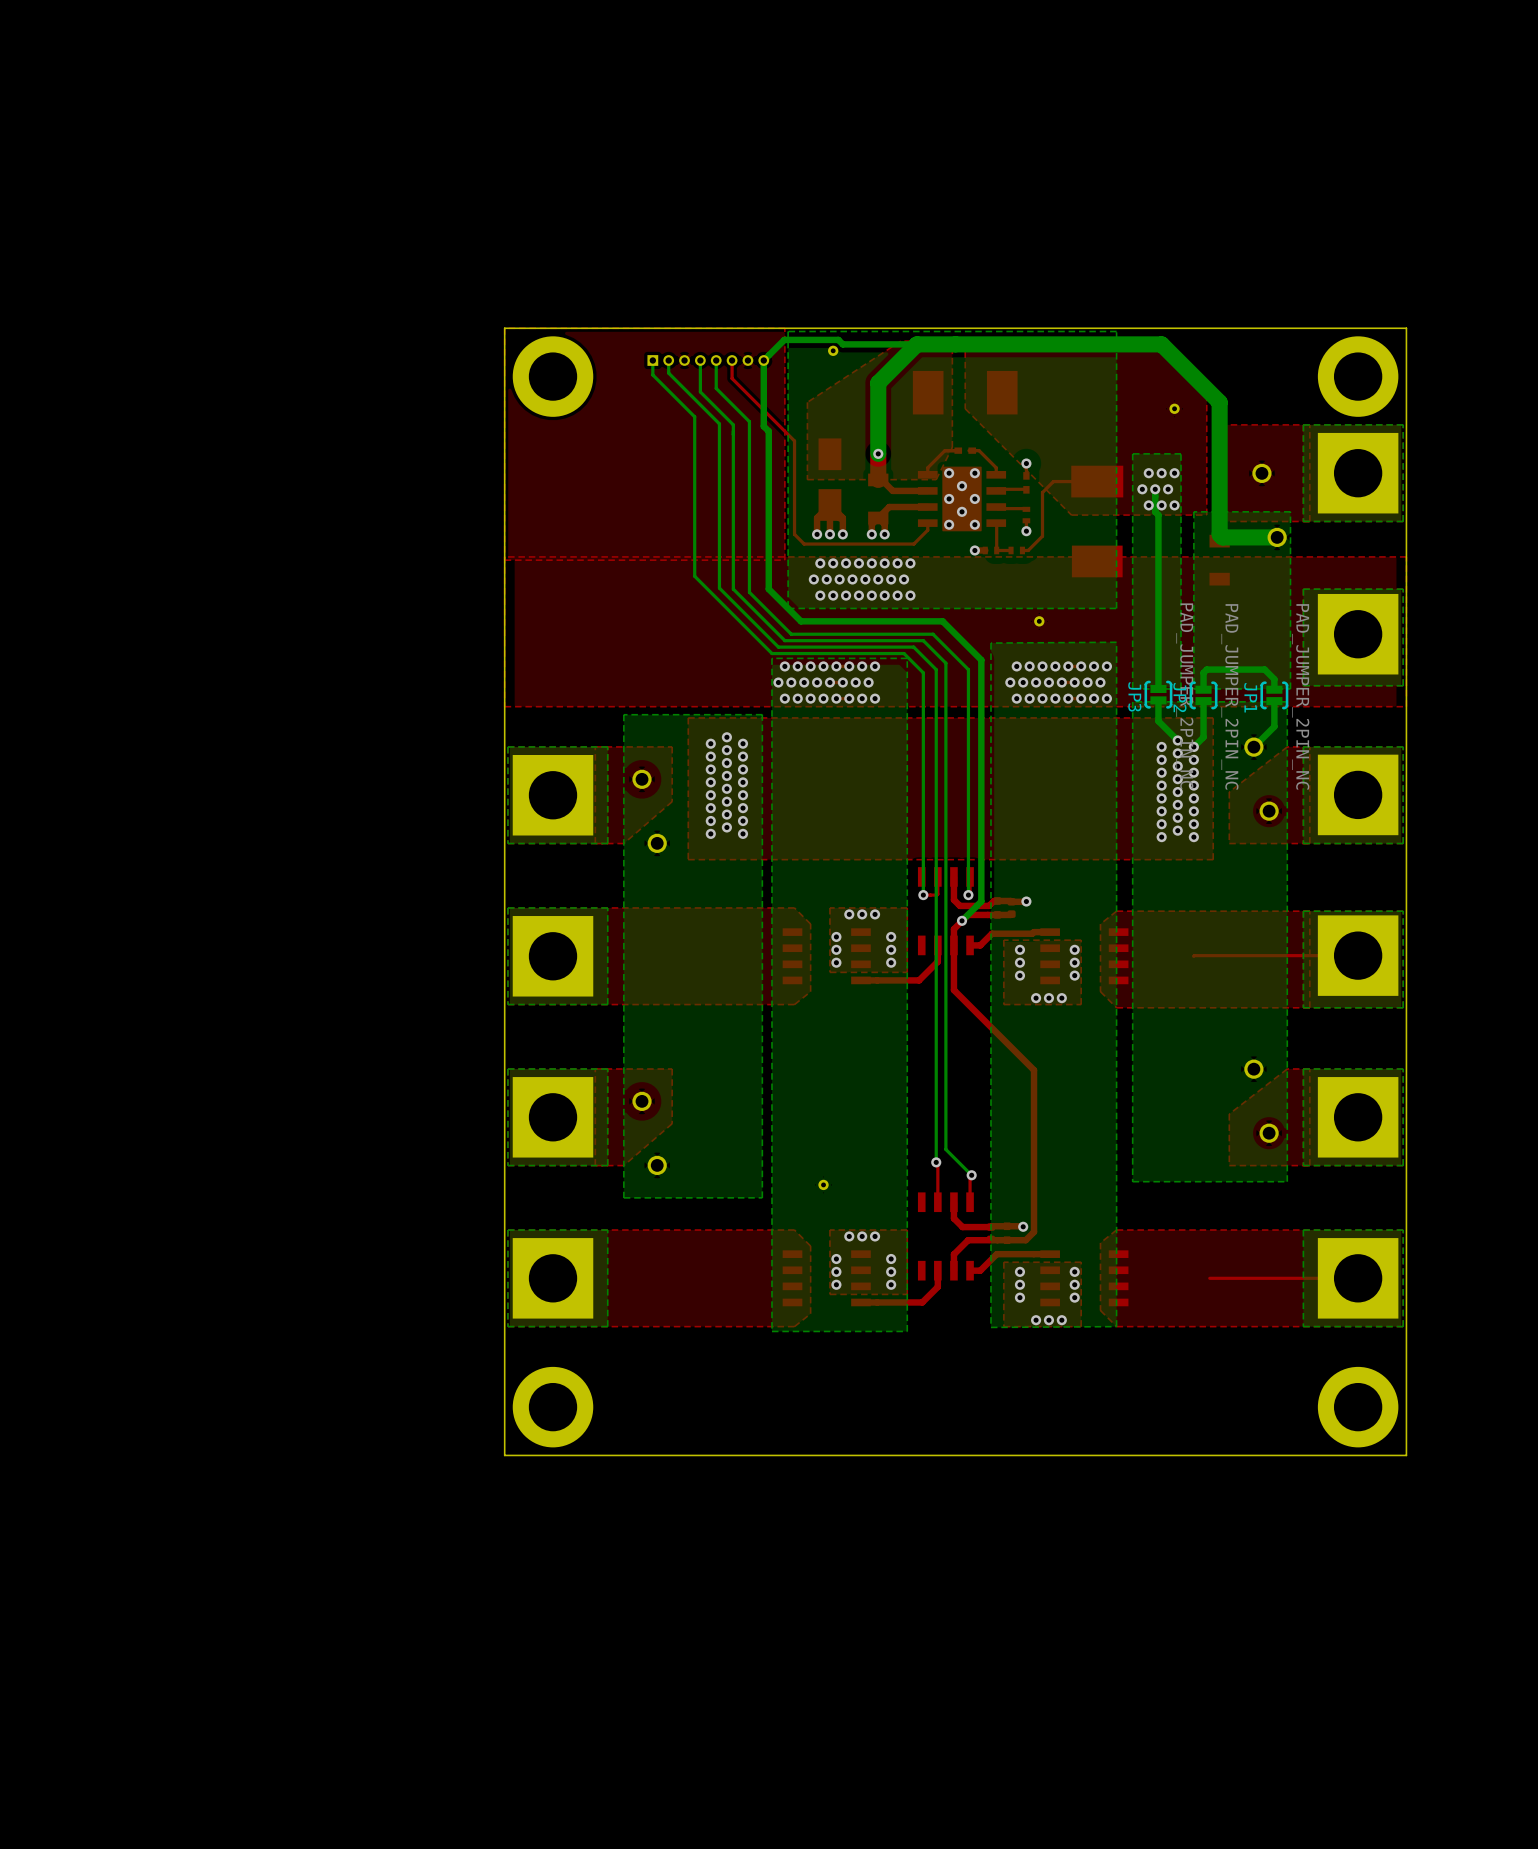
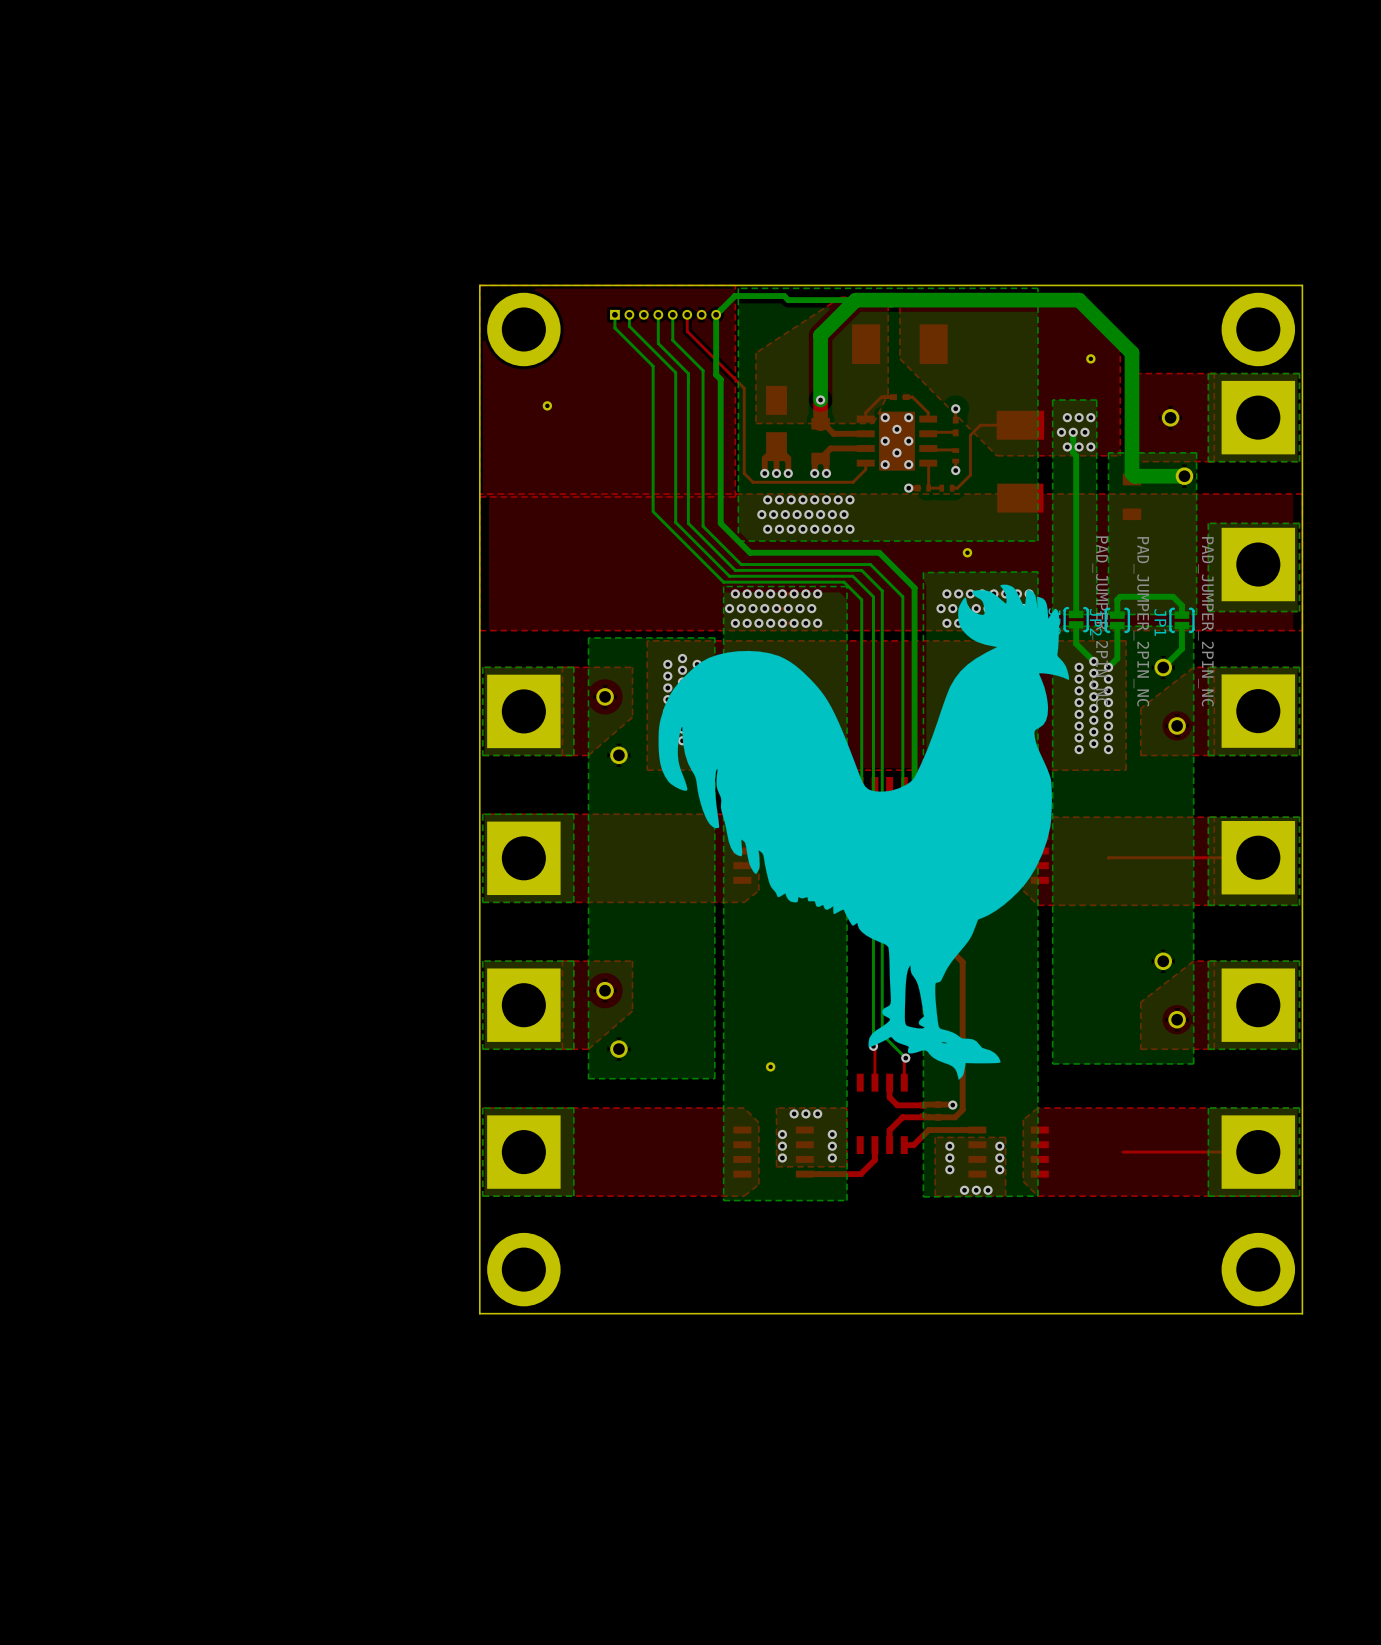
part position: (833, 350) -> (547, 405)
drawing: none -> [658, 584, 1070, 1080]

